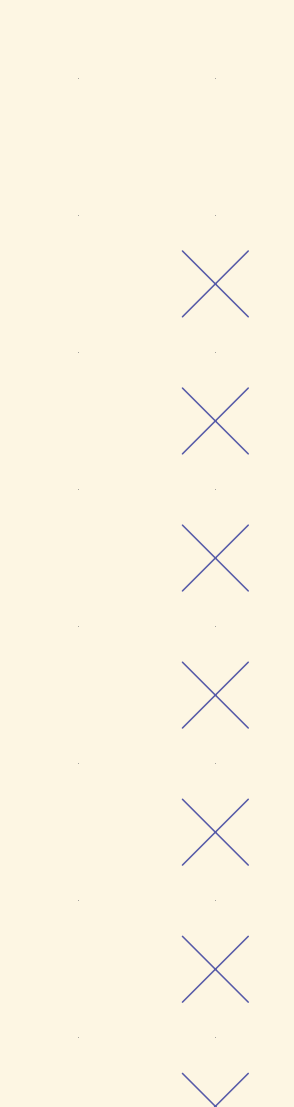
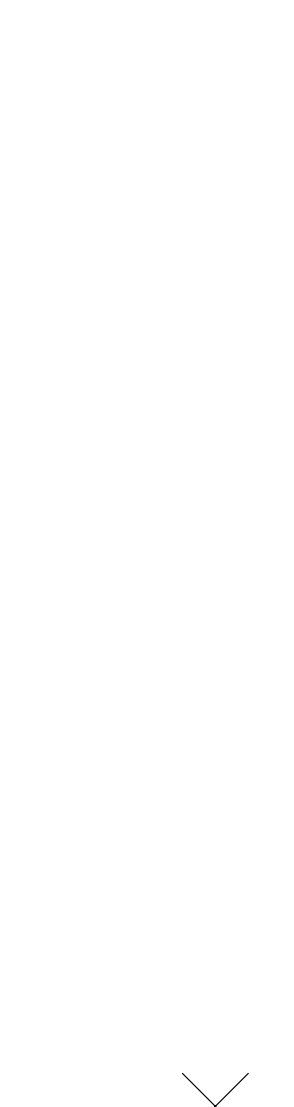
no-connect mark: (215, 283) -> none
no-connect mark: (215, 420) -> none
no-connect mark: (215, 558) -> none
no-connect mark: (215, 695) -> none
no-connect mark: (215, 832) -> none
no-connect mark: (215, 969) -> none

